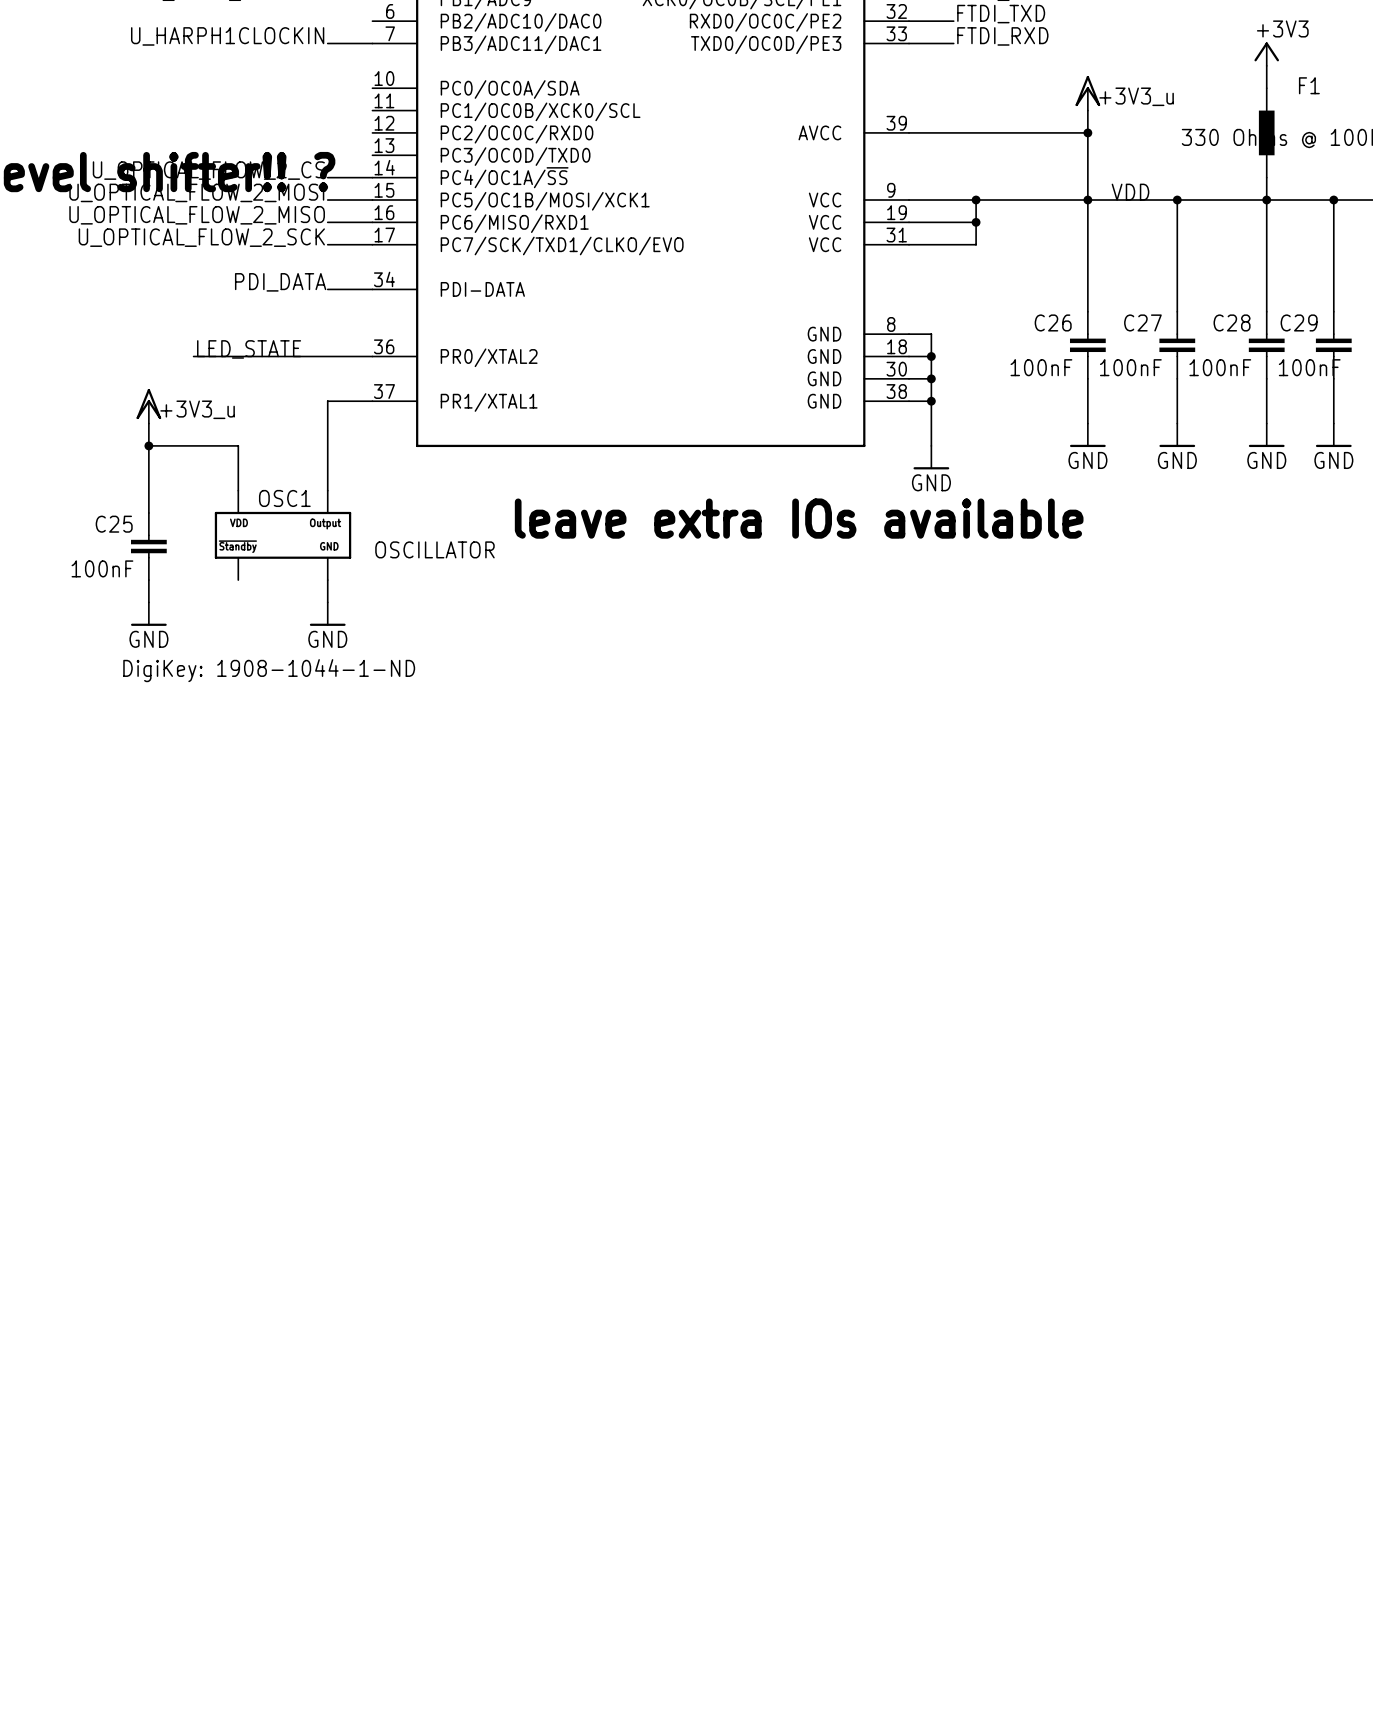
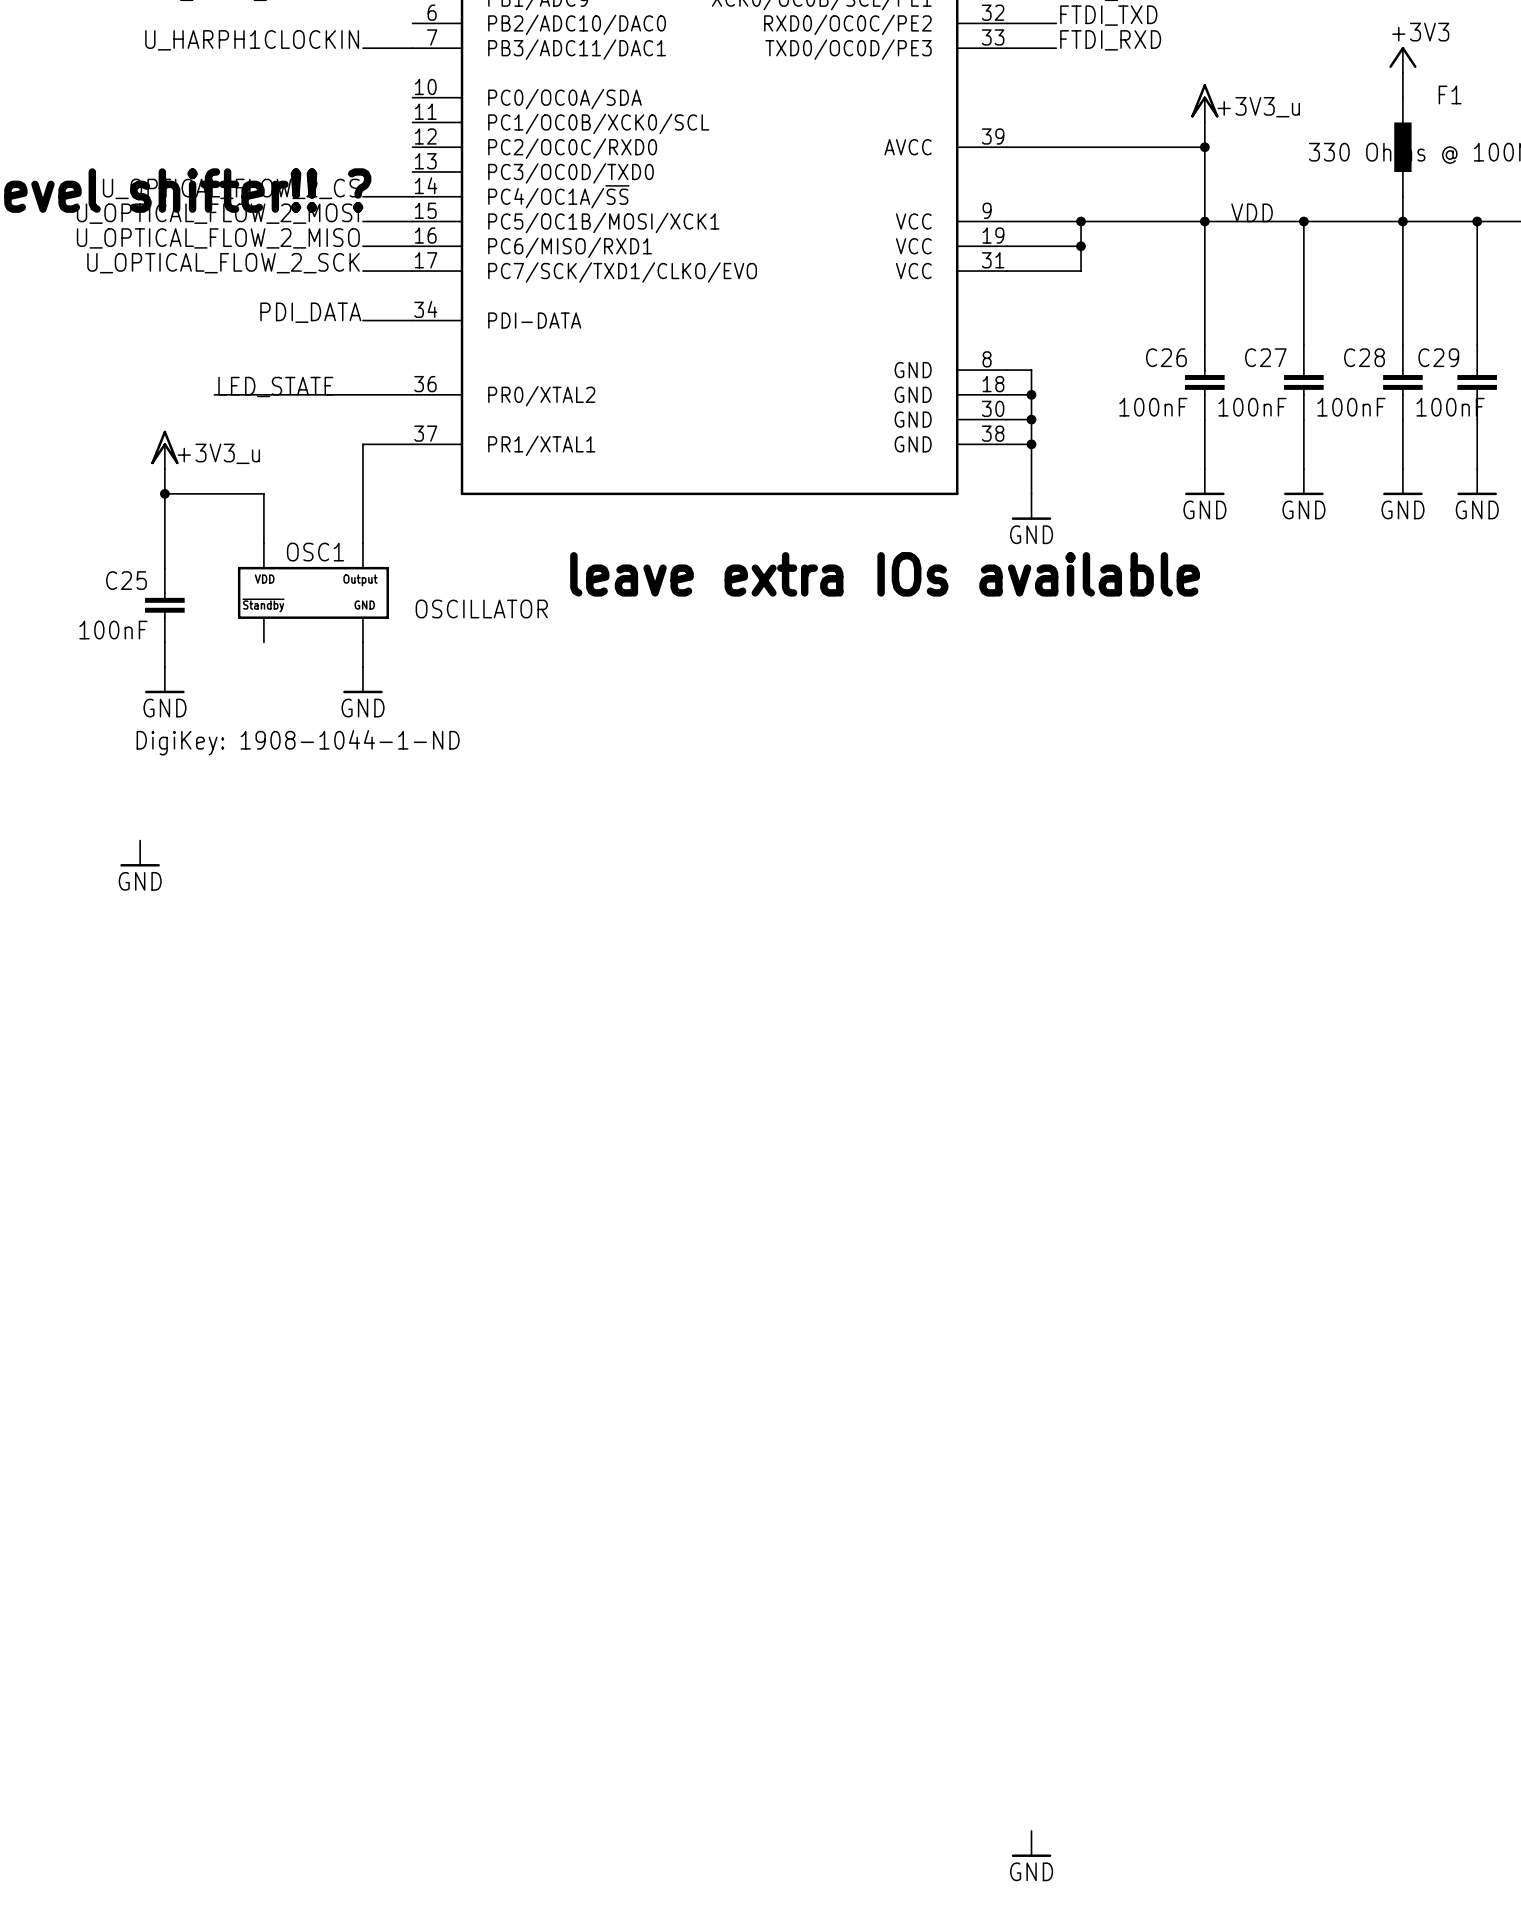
power symbol: none -> GND (140, 853)
power symbol: none -> GND (1031, 1843)

